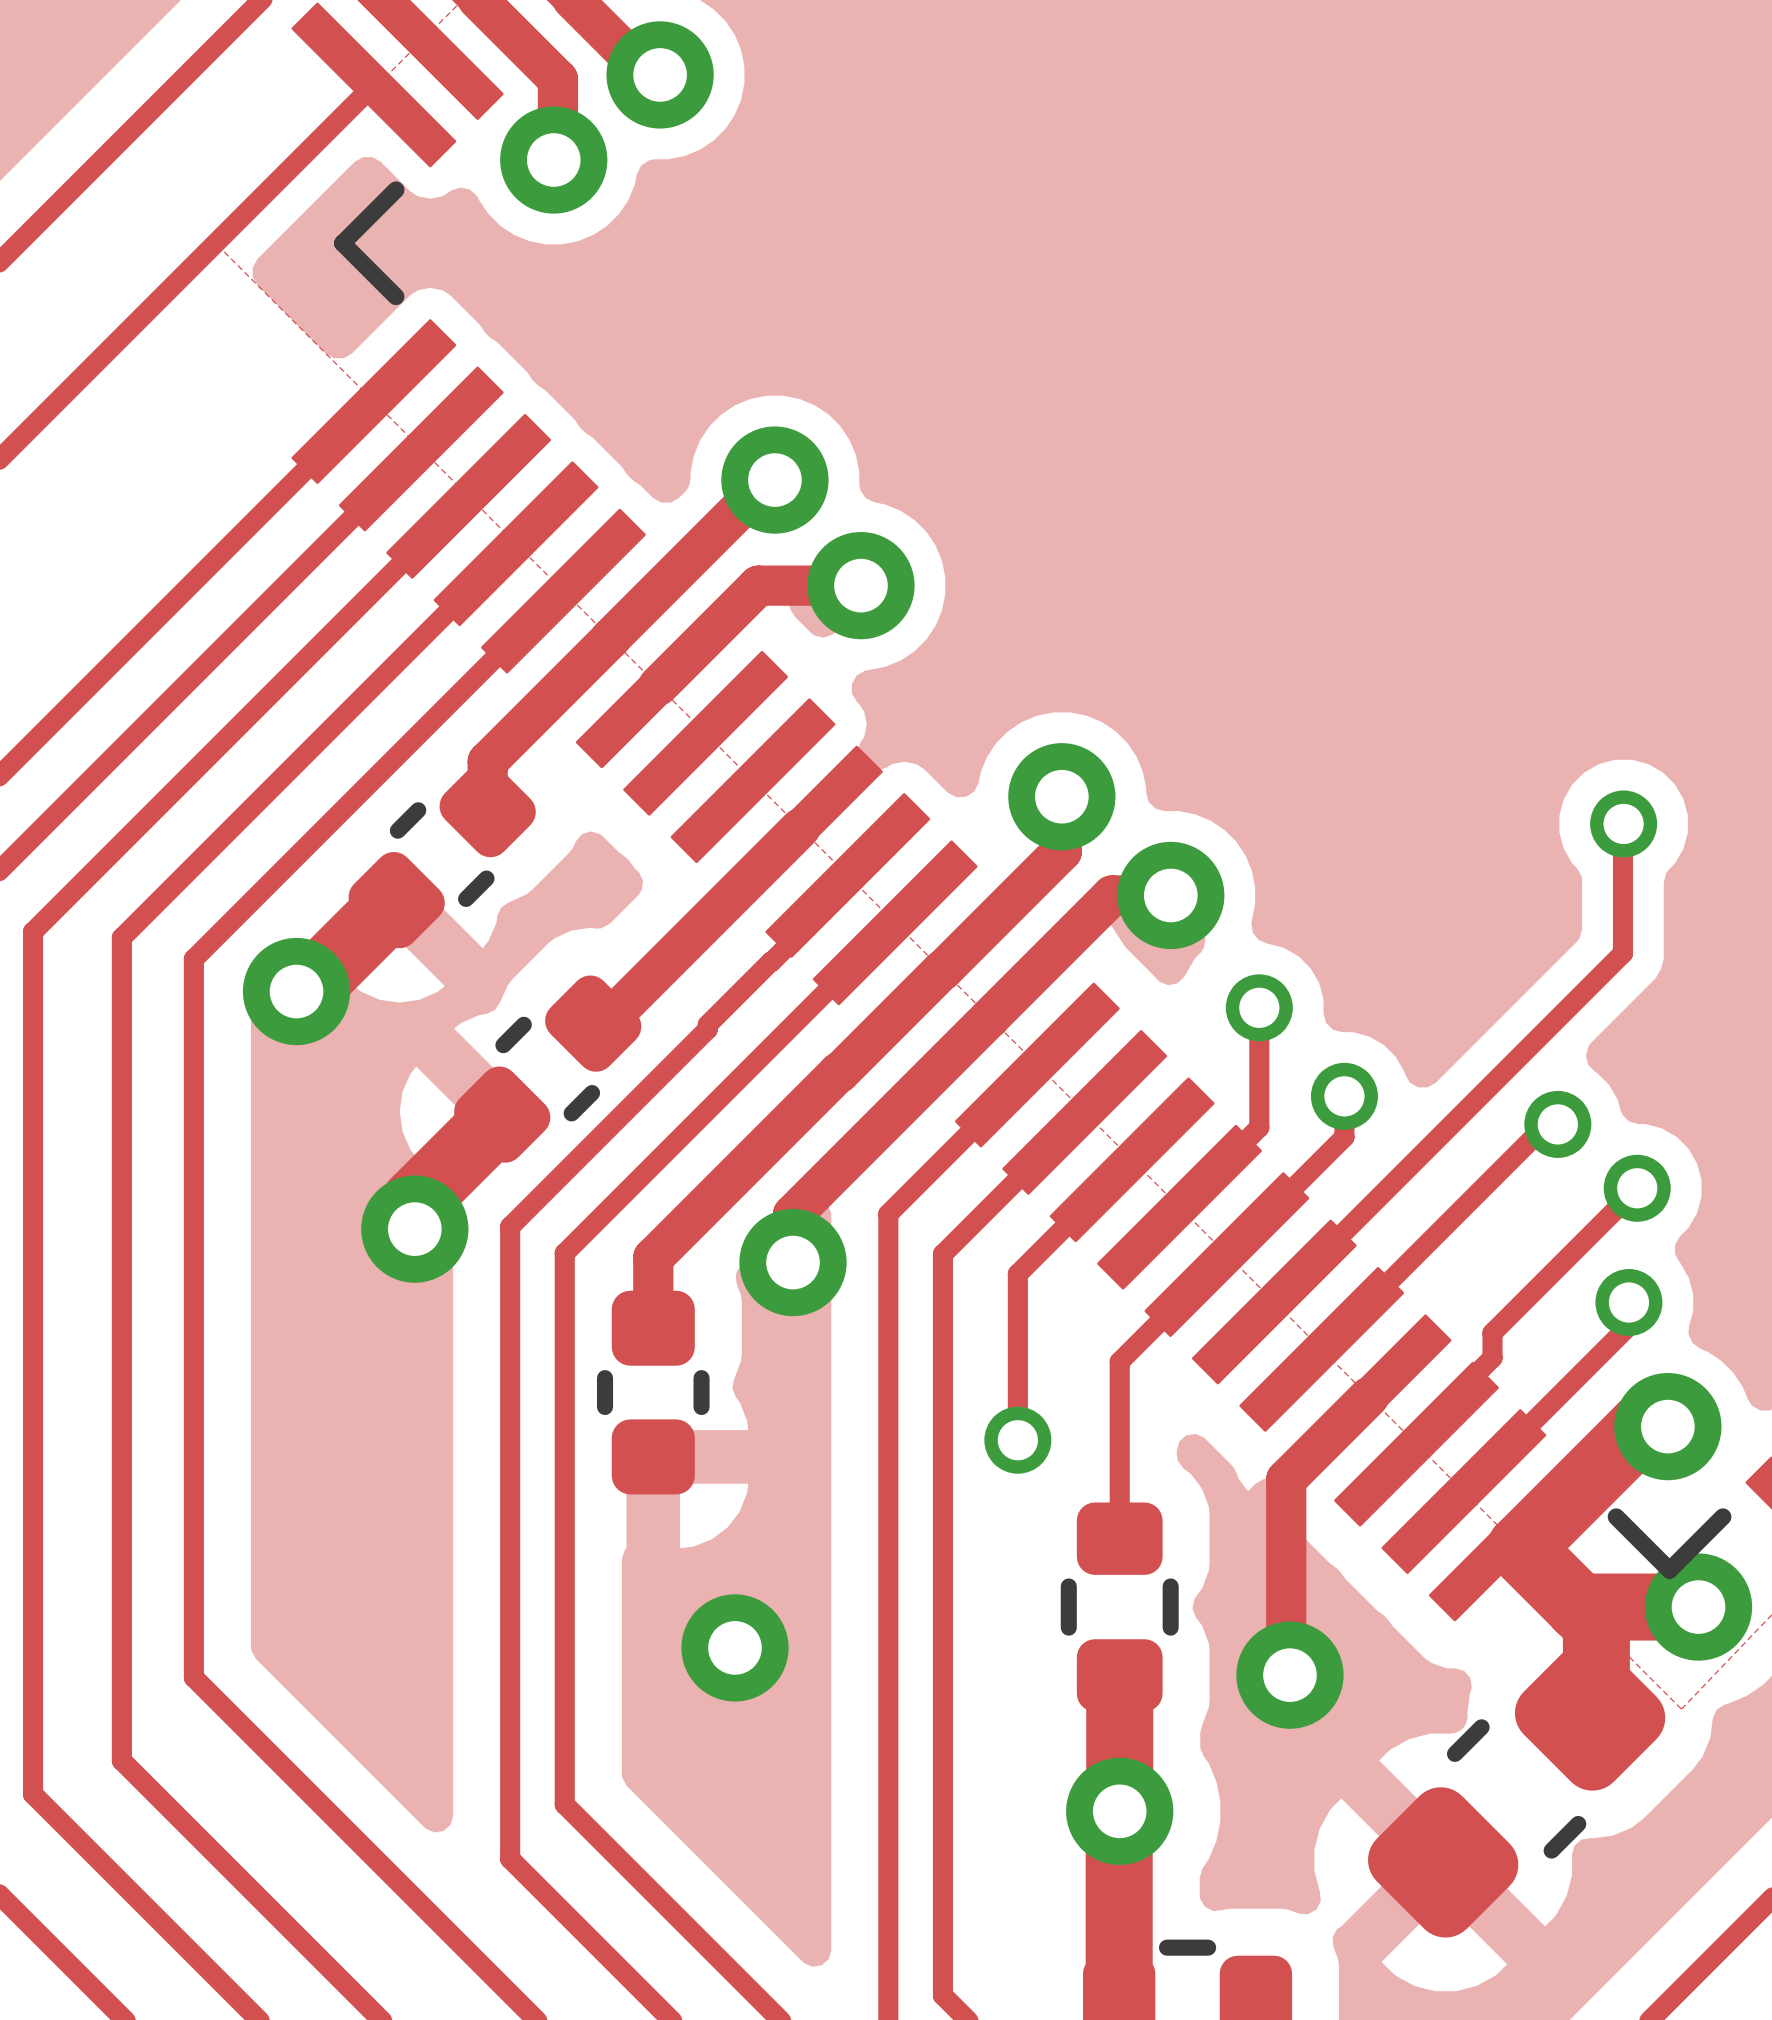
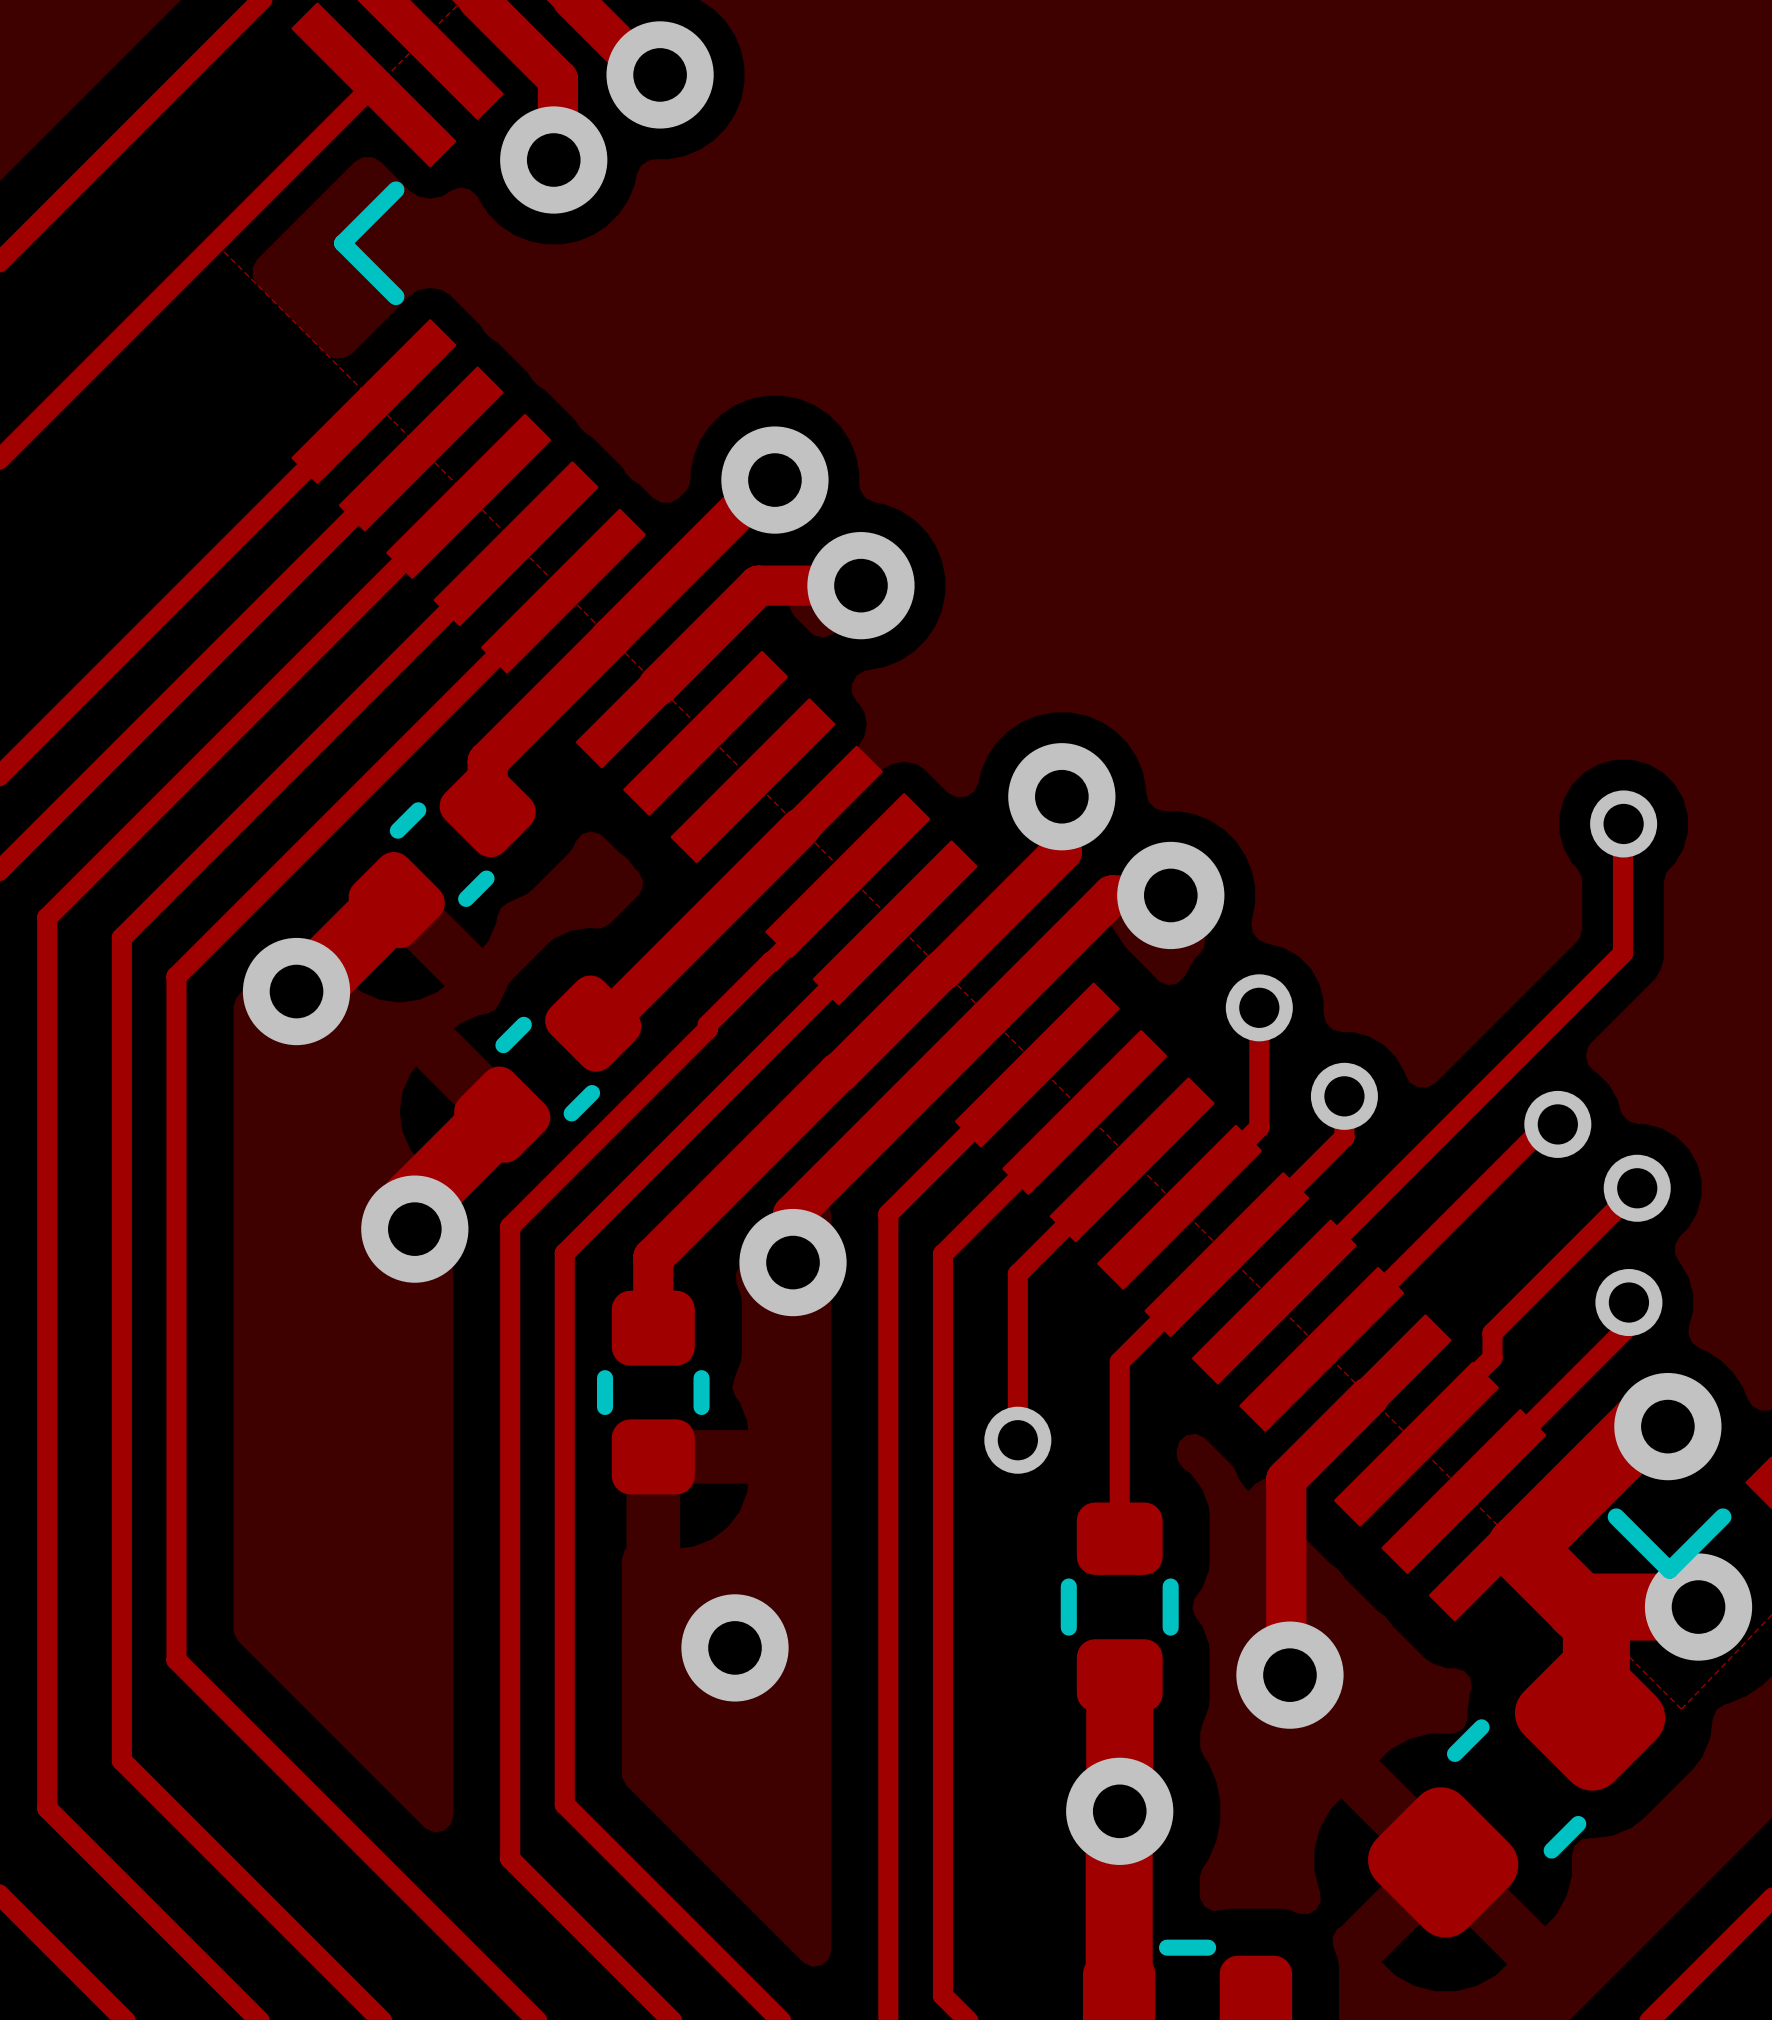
track: (47, 917) (33, 931) (33, 1794) (47, 1808) -> (47, 917) (47, 1808)
track: (193, 959) (193, 1677) -> (193, 959) (176, 976) (176, 1660) (193, 1677)

